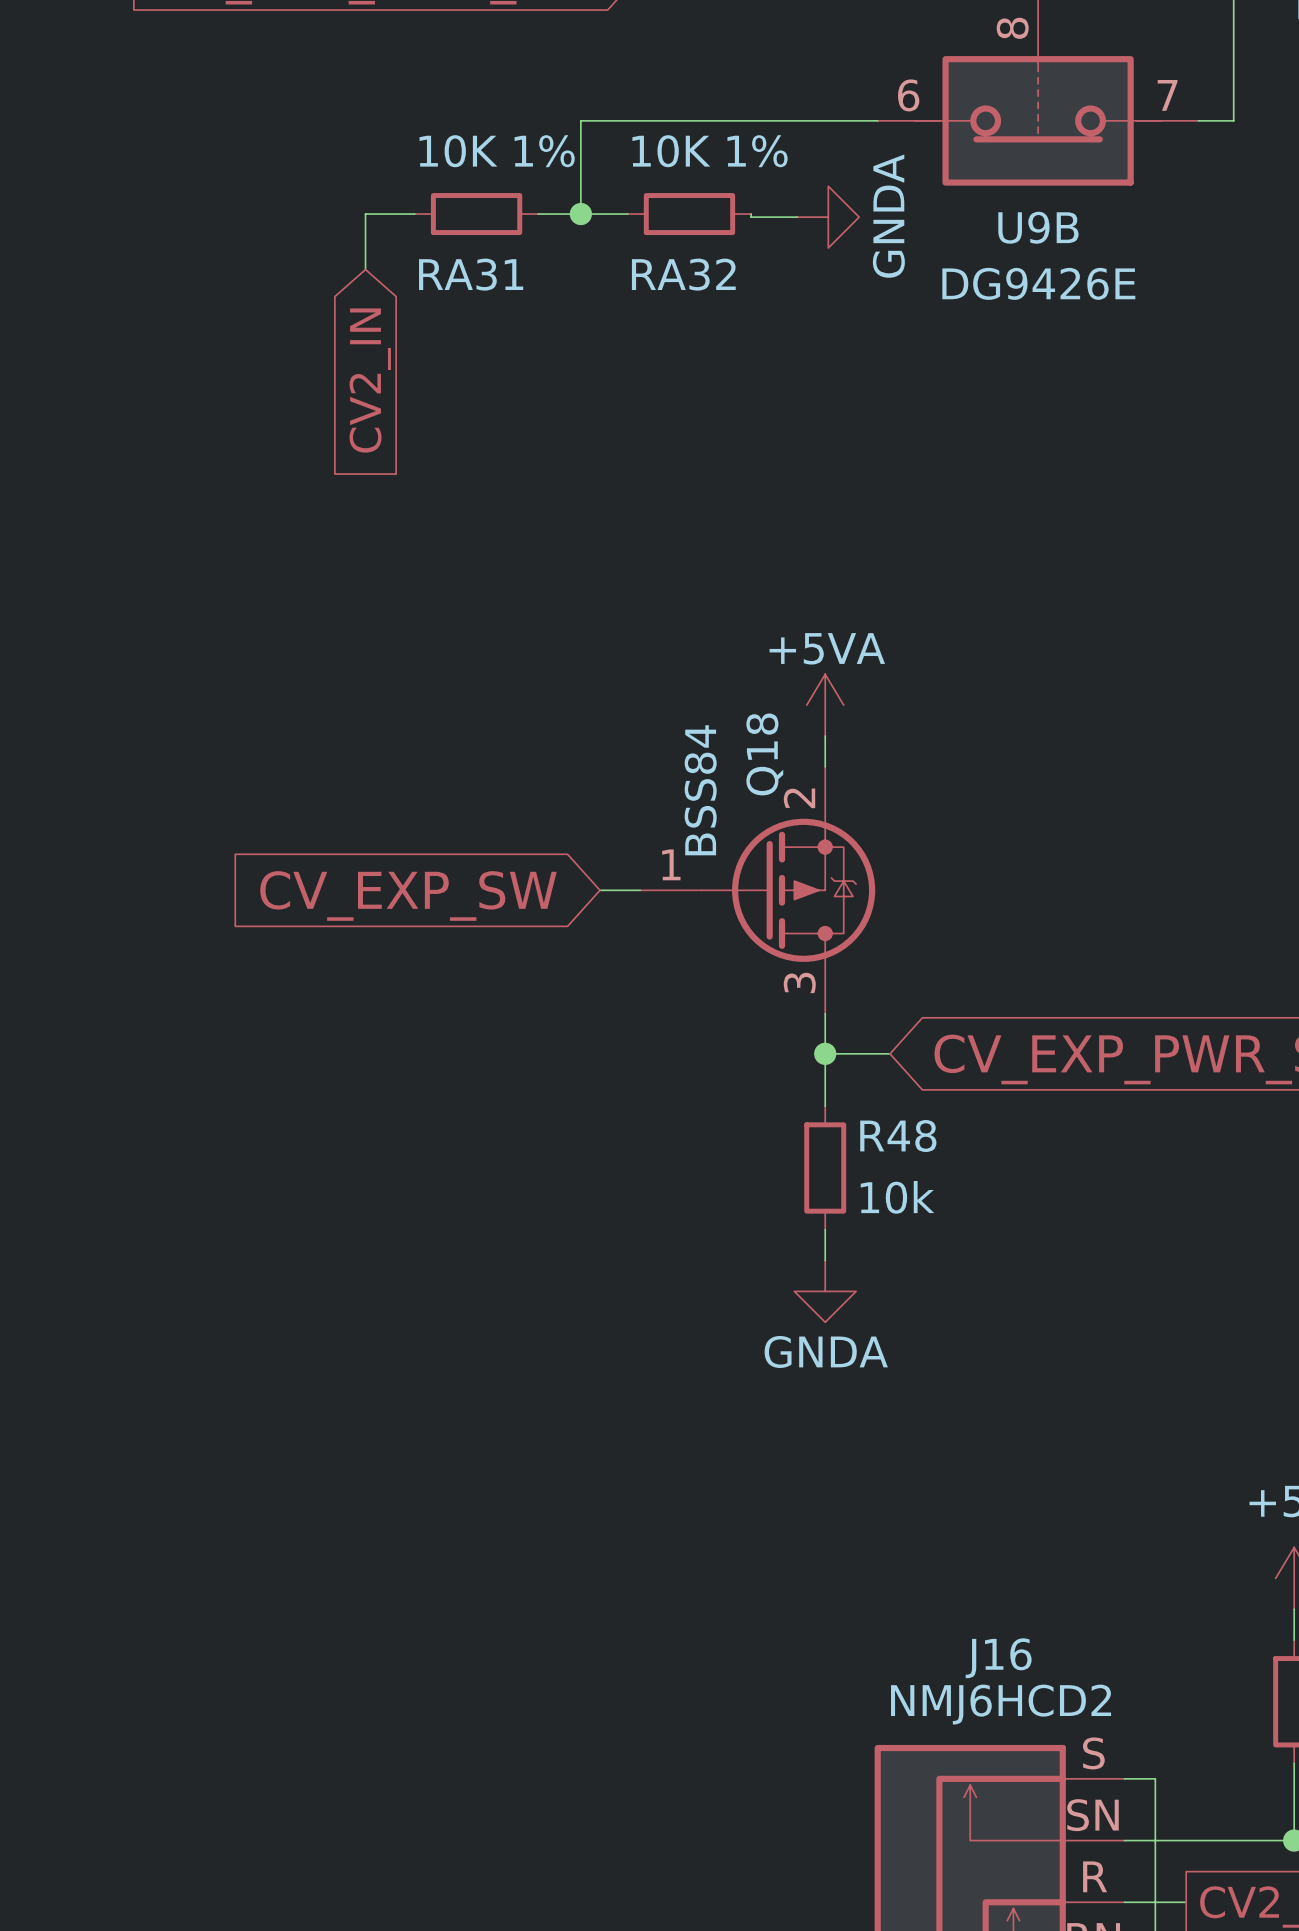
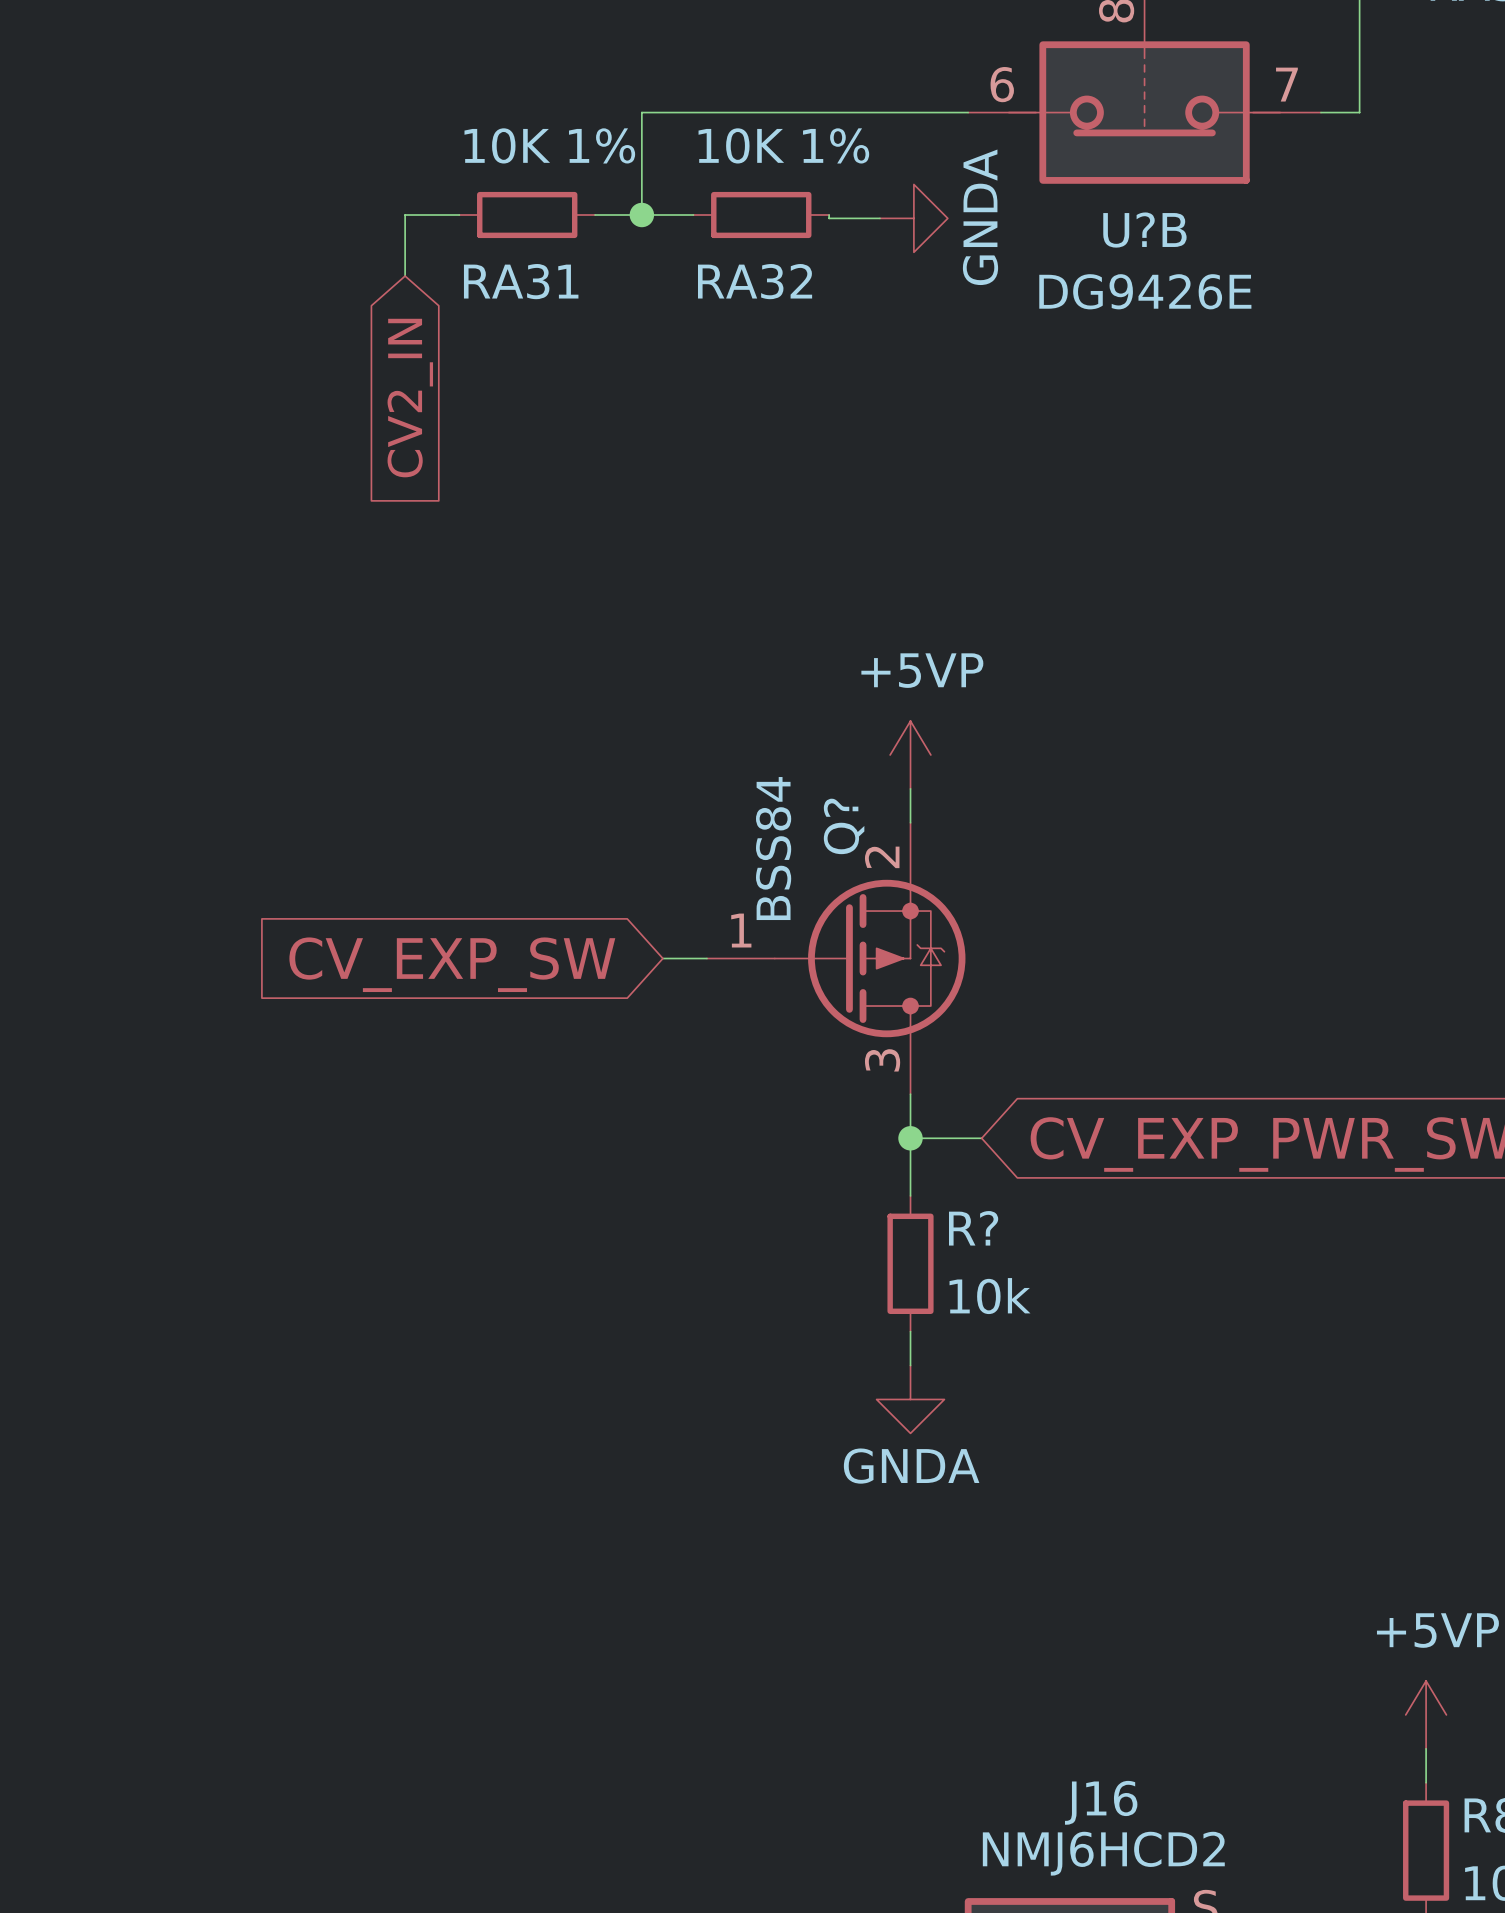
U9B name: U9B (1038, 227) -> U?B (1144, 230)
power symbol: +5VA (825, 705) -> +5VP (910, 755)
Q18 name: Q18 (764, 754) -> Q? (844, 826)
R48 name: R48 (898, 1136) -> R? (973, 1228)

